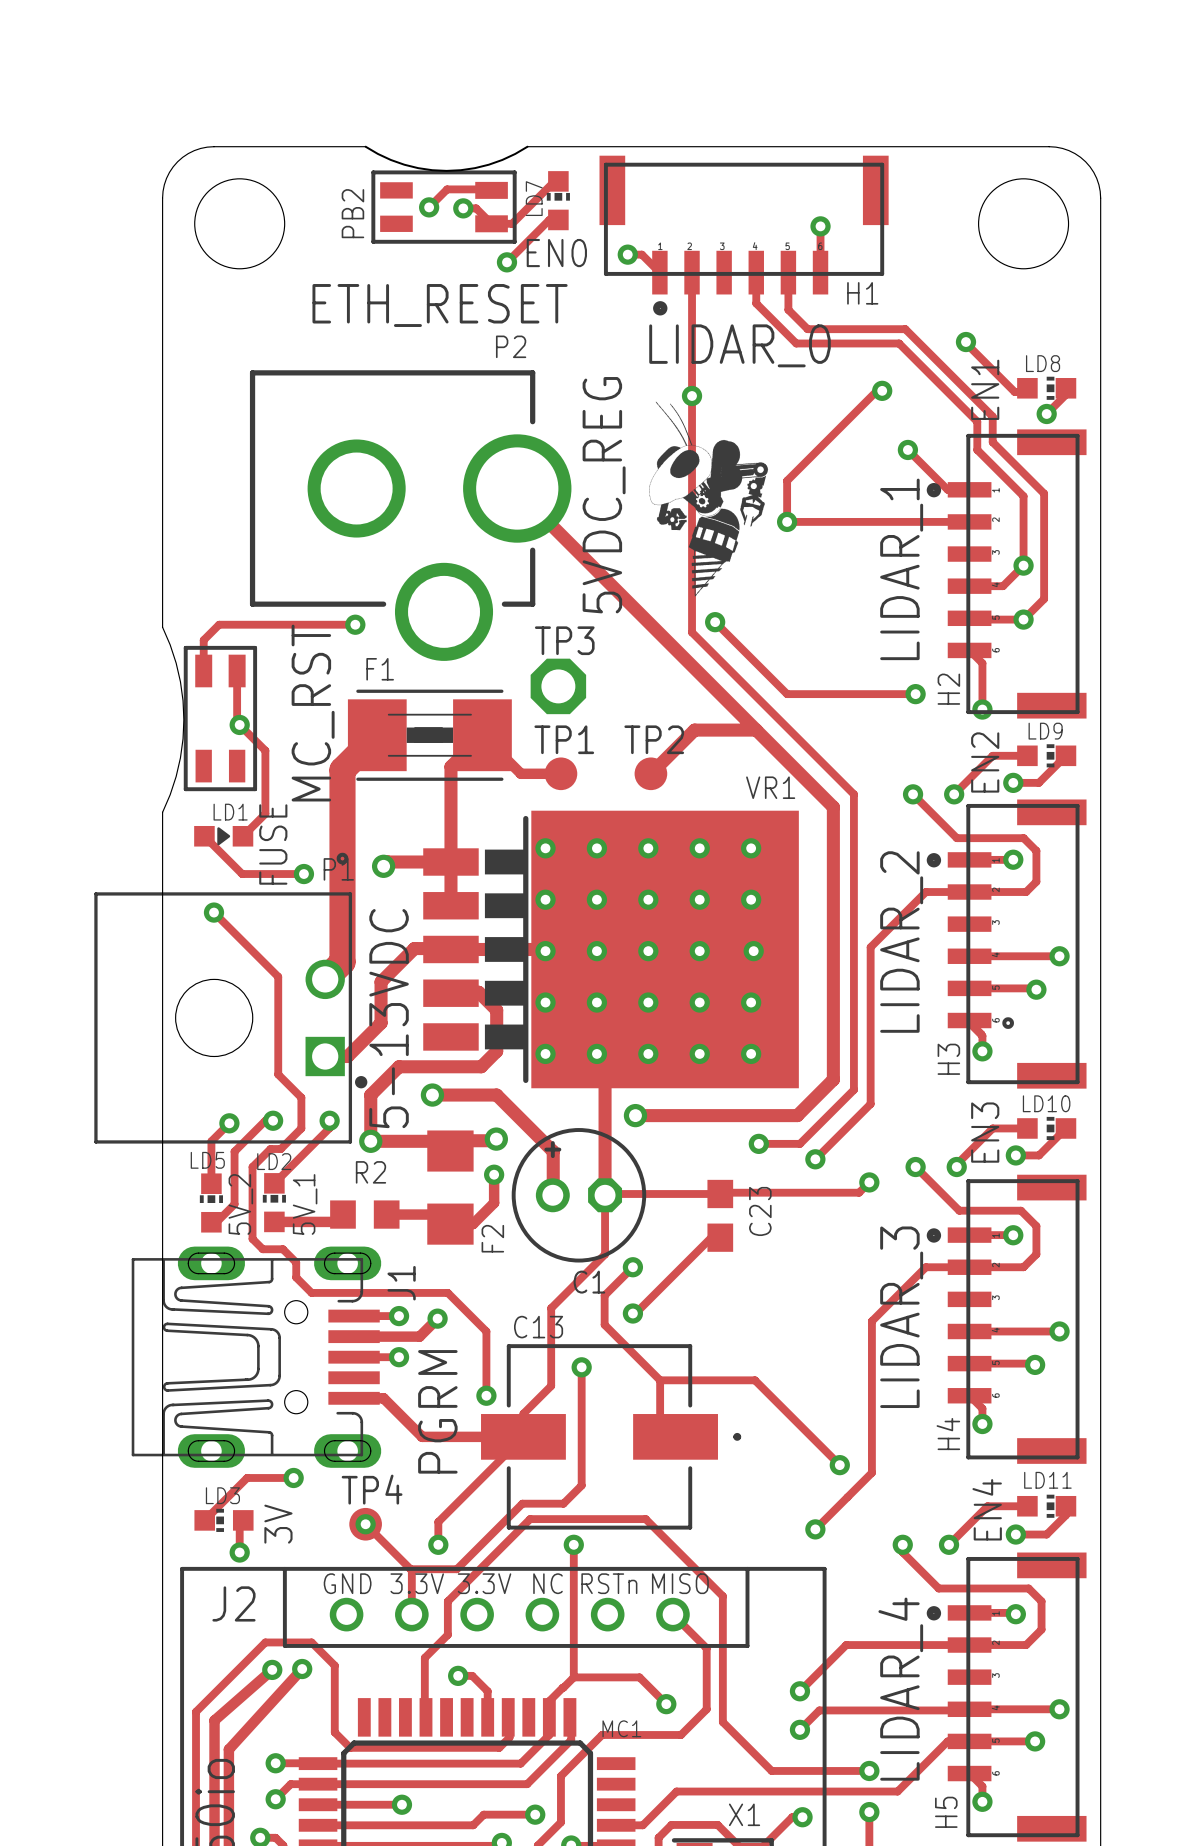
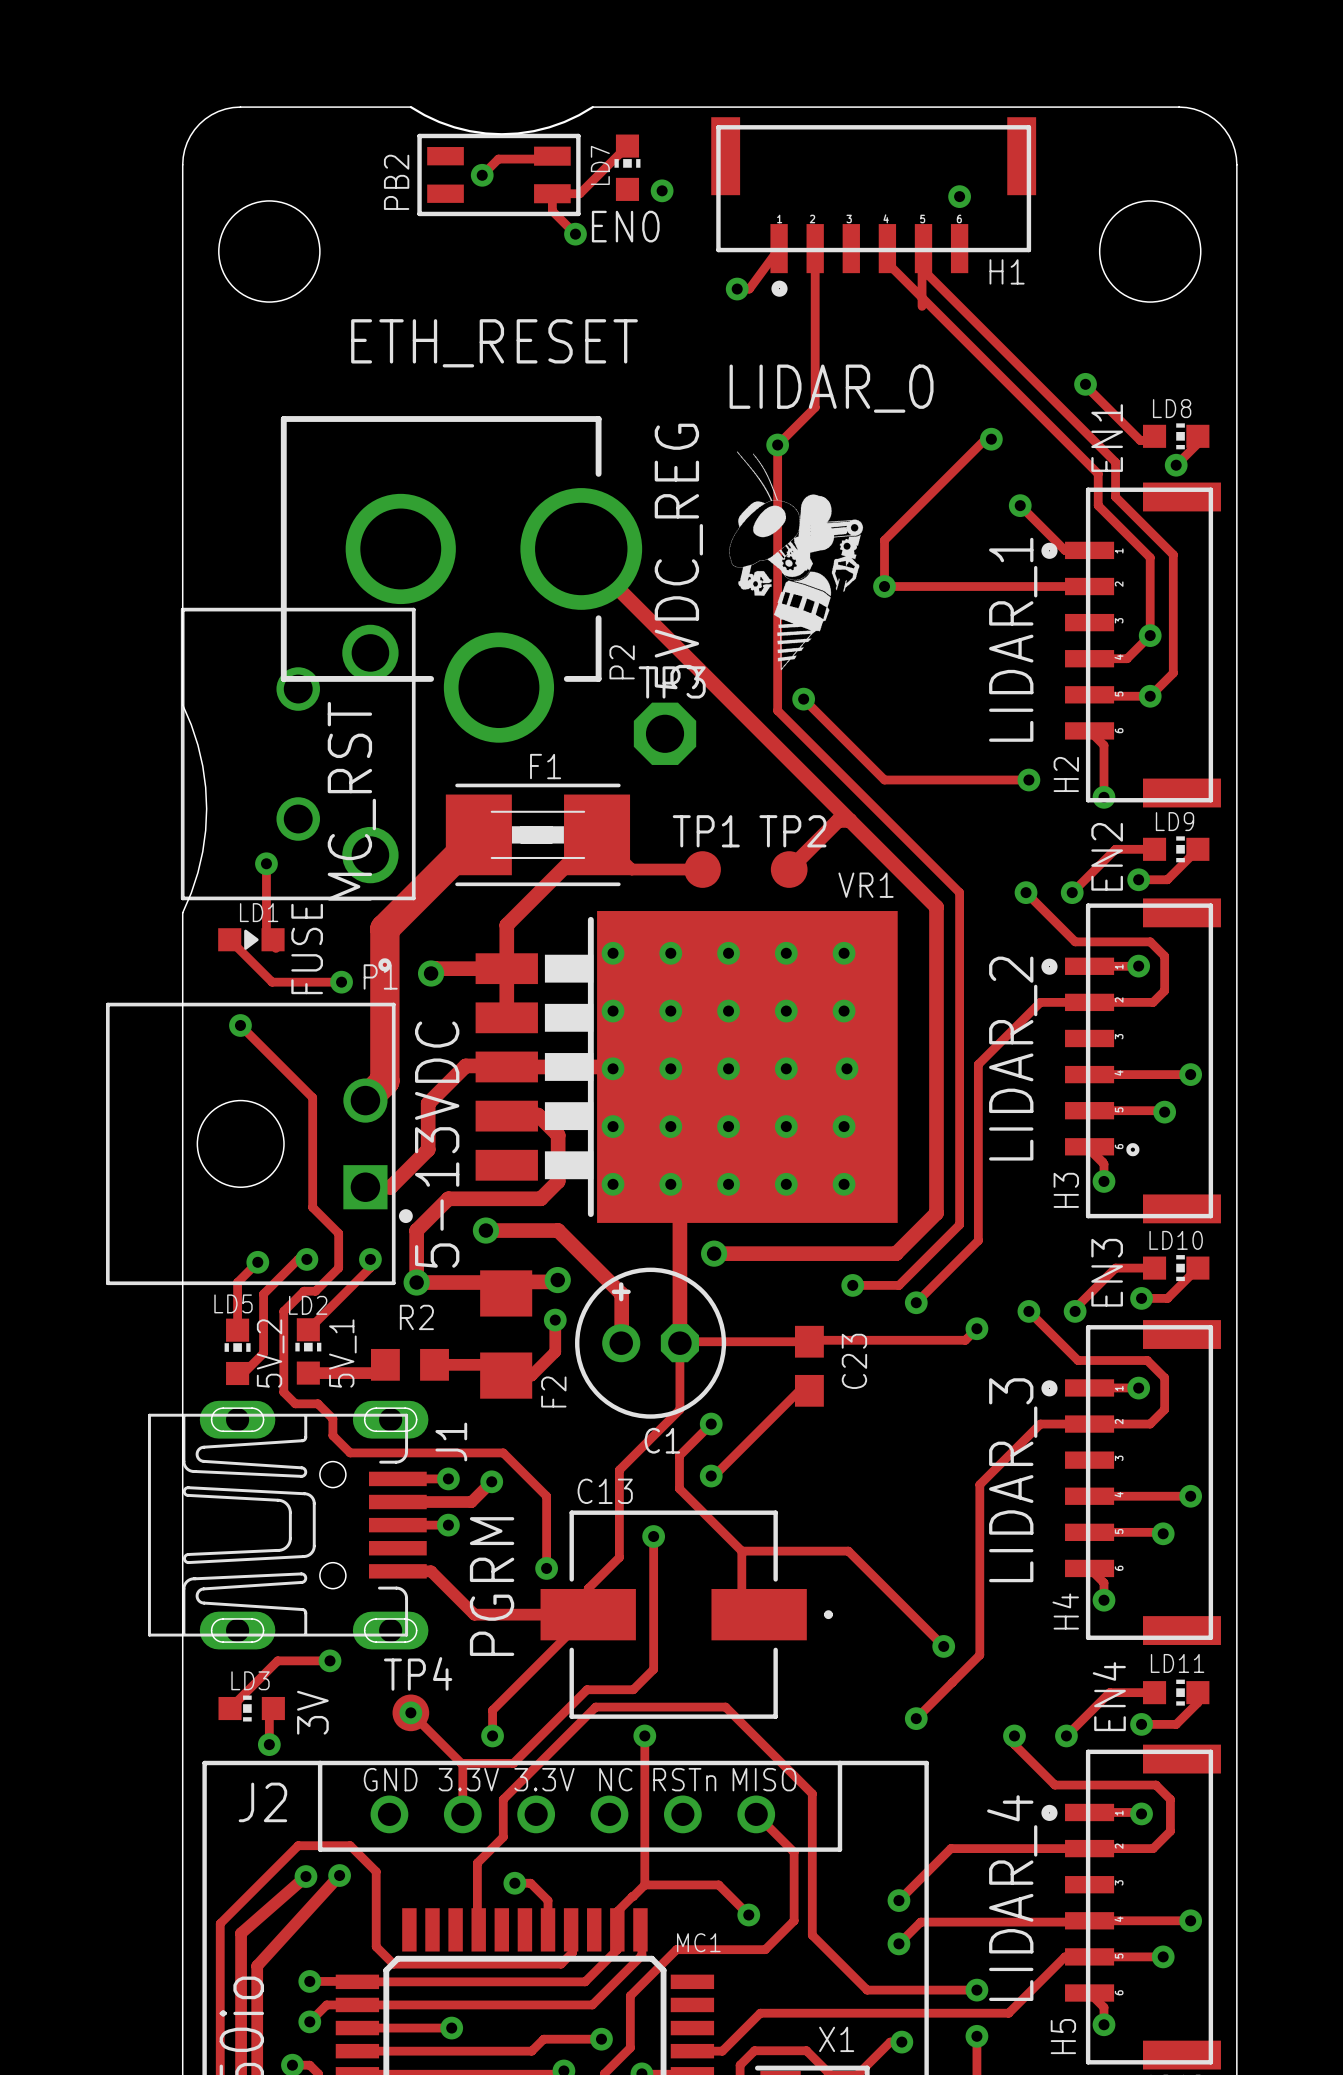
track: none -> (627, 146) (579, 193) (552, 193) (552, 211) (575, 234)
track: none -> (552, 156) (549, 159) (498, 159) (482, 175)
via: none -> (482, 175)
via: none -> (662, 190)
track: (558, 181) (554, 181) (512, 223) (491, 223) (476, 208) (463, 208) -> none
track: (491, 190) (447, 189) (429, 207) -> none
board edge: (162, 198) (166, 178) (177, 161) (194, 150) (213, 146) (365, 146) (404, 164) (446, 170) (488, 164) (527, 146) (1049, 146) (1068, 150) (1085, 161) (1096, 178) (1100, 198) -> (182, 222) (183, 157) (190, 135) (199, 124) (211, 114) (225, 109) (240, 107) (410, 107) (424, 115) (454, 127) (469, 131) (501, 134) (533, 131) (549, 127) (578, 115) (592, 107) (1186, 107) (1201, 111) (1214, 119) (1224, 129) (1232, 142) (1236, 164) (1236, 222)
LD7 position: (558, 200) -> (627, 167)
via: (429, 207) -> none
PB2 position: (444, 207) -> (498, 174)
via: (463, 208) -> none
via: none -> (575, 234)
track: (558, 219) (549, 219) (506, 262) -> none
track: none -> (779, 248) (749, 289) (737, 289)
via position: (820, 226) -> (959, 196)
H1 position: (744, 235) -> (873, 206)
text position: EN0 (556, 253) -> EN0 (625, 226)
track: (627, 254) (641, 254) (659, 272) -> none
via position: (627, 254) -> (737, 289)
via: (506, 262) -> none
track: (692, 272) (692, 395) -> (815, 248) (815, 407) (777, 444)
track: (756, 272) (756, 303) (796, 343) (899, 343) -> (887, 248) (887, 263) (1010, 385)
track: (788, 272) (788, 309) (807, 329) (905, 329) (992, 416) -> (923, 248) (923, 270) (1115, 462) (1115, 468)
P2 name rotation: 0° (511, 346) -> 90° counterclockwise (622, 662)
P2 name position: P2 (511, 346) -> P2 (622, 662)
track: (355, 624) (219, 624) (203, 640) (203, 670) -> none
via: (355, 624) -> none
F1 name position: F1 (380, 669) -> F1 (545, 766)
track: (237, 670) (237, 722) (265, 750) (265, 813) (242, 836) -> none
part: none -> (298, 754)
TP3 position: (558, 686) -> (665, 733)
part: (220, 718) -> none
via position: (239, 724) -> (266, 863)
track: (745, 730) (694, 730) (650, 773) -> (838, 820) (789, 869)
track: (377, 735) (342, 770) (342, 826) -> (478, 834) (384, 928)
F1 position: (429, 735) -> (537, 834)
track: none -> (266, 863) (266, 933) (278, 945) (275, 948)
track: (560, 773) (521, 773) (482, 735) (450, 766) (450, 823) -> (702, 869) (631, 869) (597, 834) (506, 925)
TP1 position: (560, 773) -> (702, 869)
TP2 position: (650, 773) -> (789, 869)

